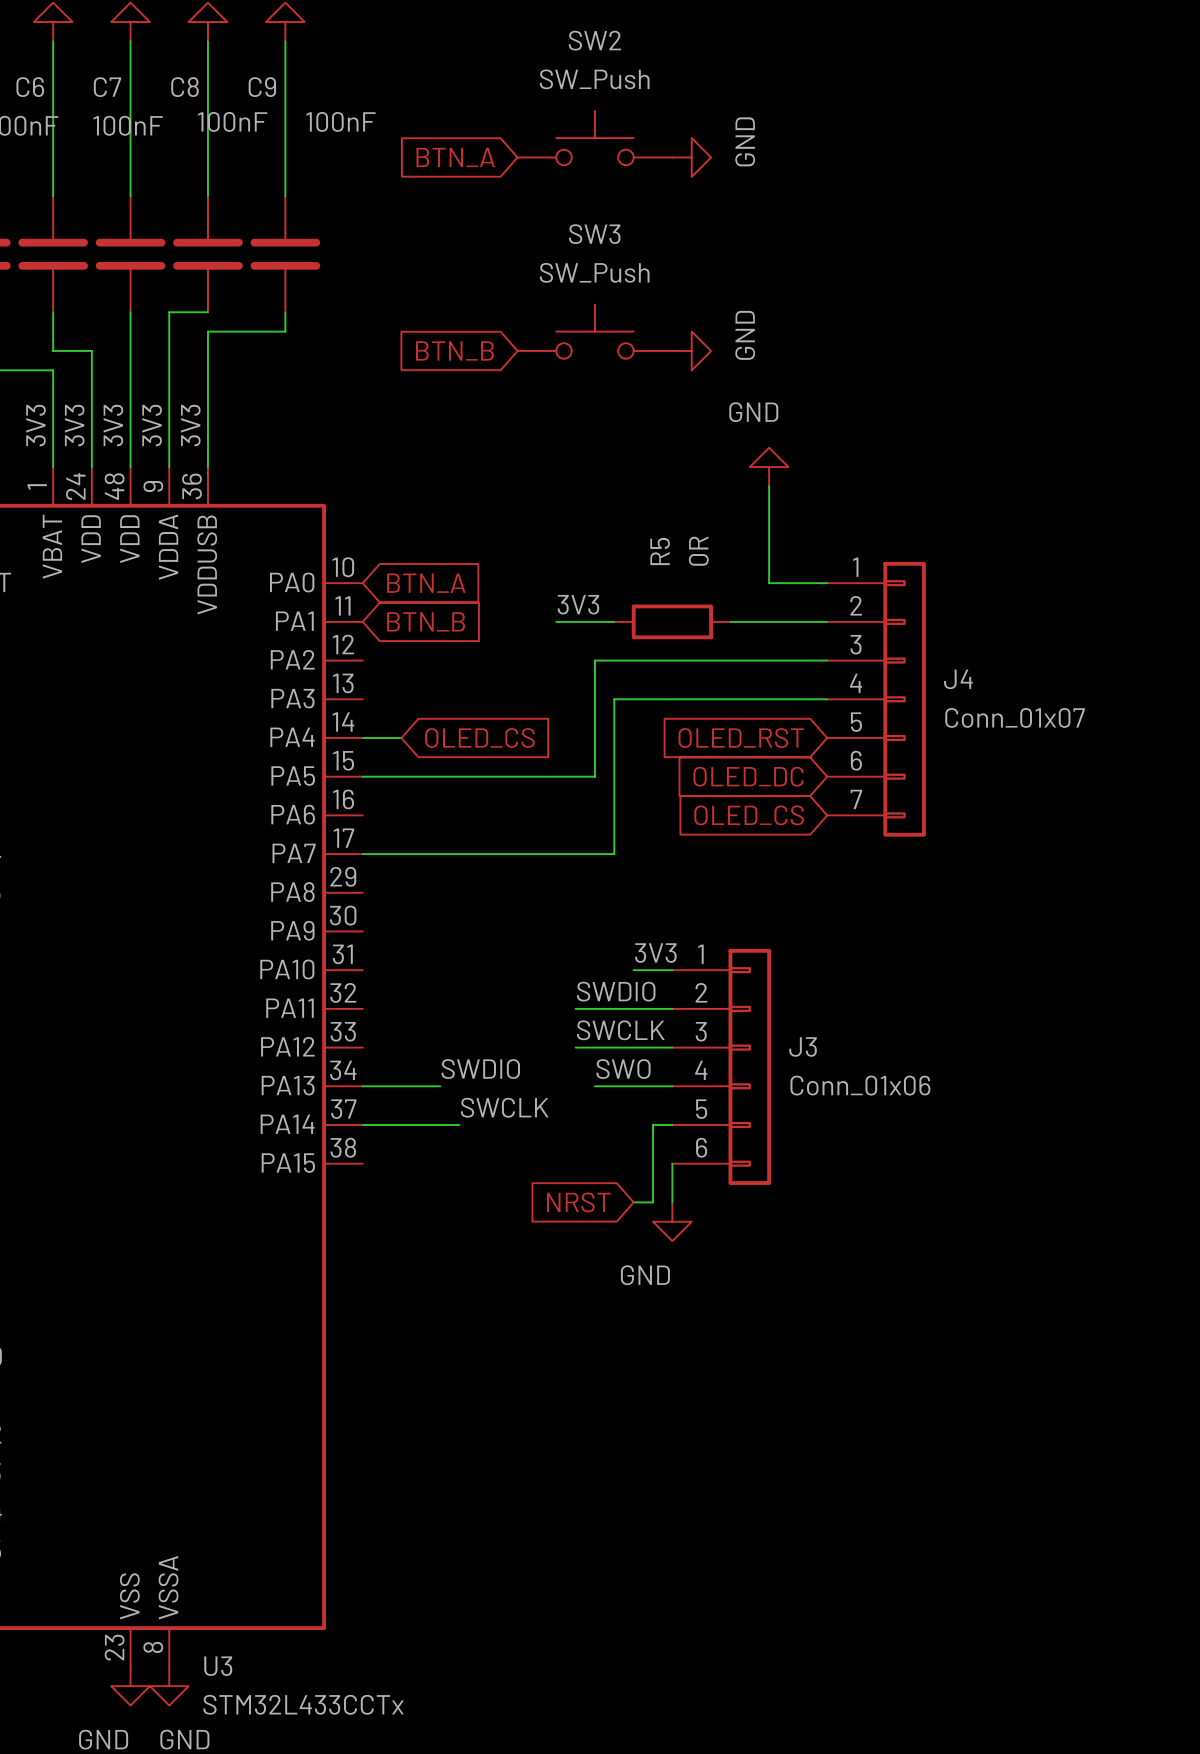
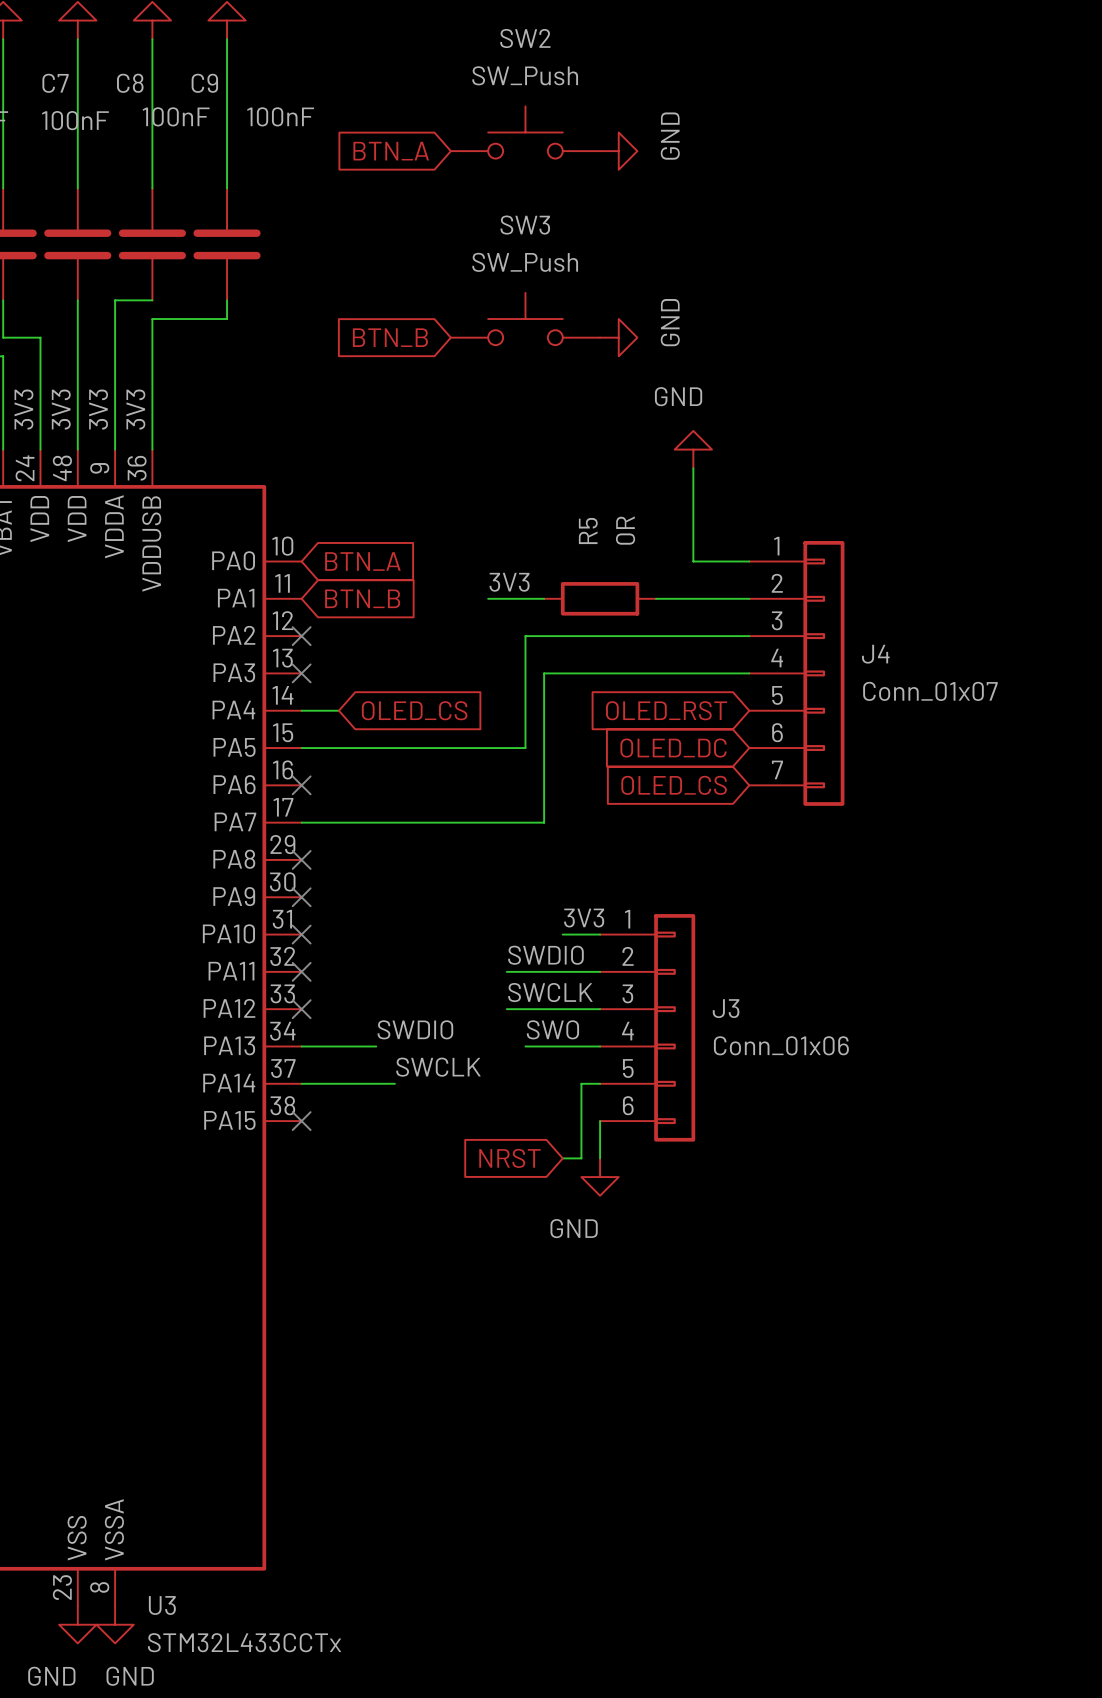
no-connect mark: none -> (301, 636)
no-connect mark: none -> (301, 673)
no-connect mark: none -> (301, 785)
no-connect mark: none -> (301, 859)
no-connect mark: none -> (301, 897)
no-connect mark: none -> (301, 934)
no-connect mark: none -> (301, 971)
no-connect mark: none -> (301, 1009)
no-connect mark: none -> (301, 1121)

